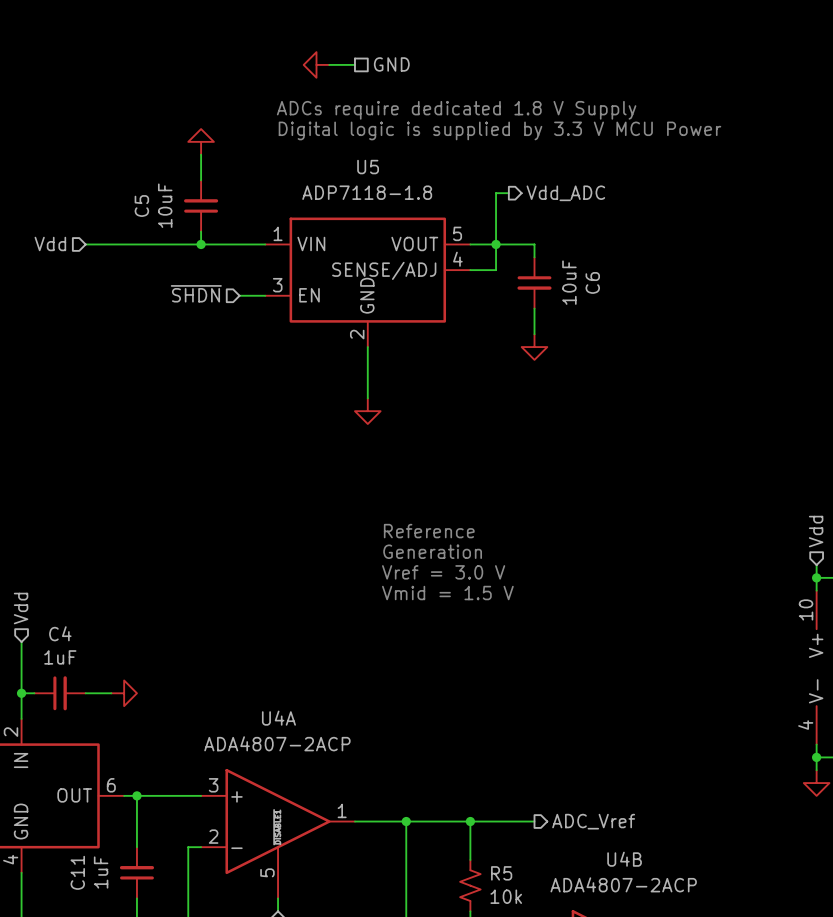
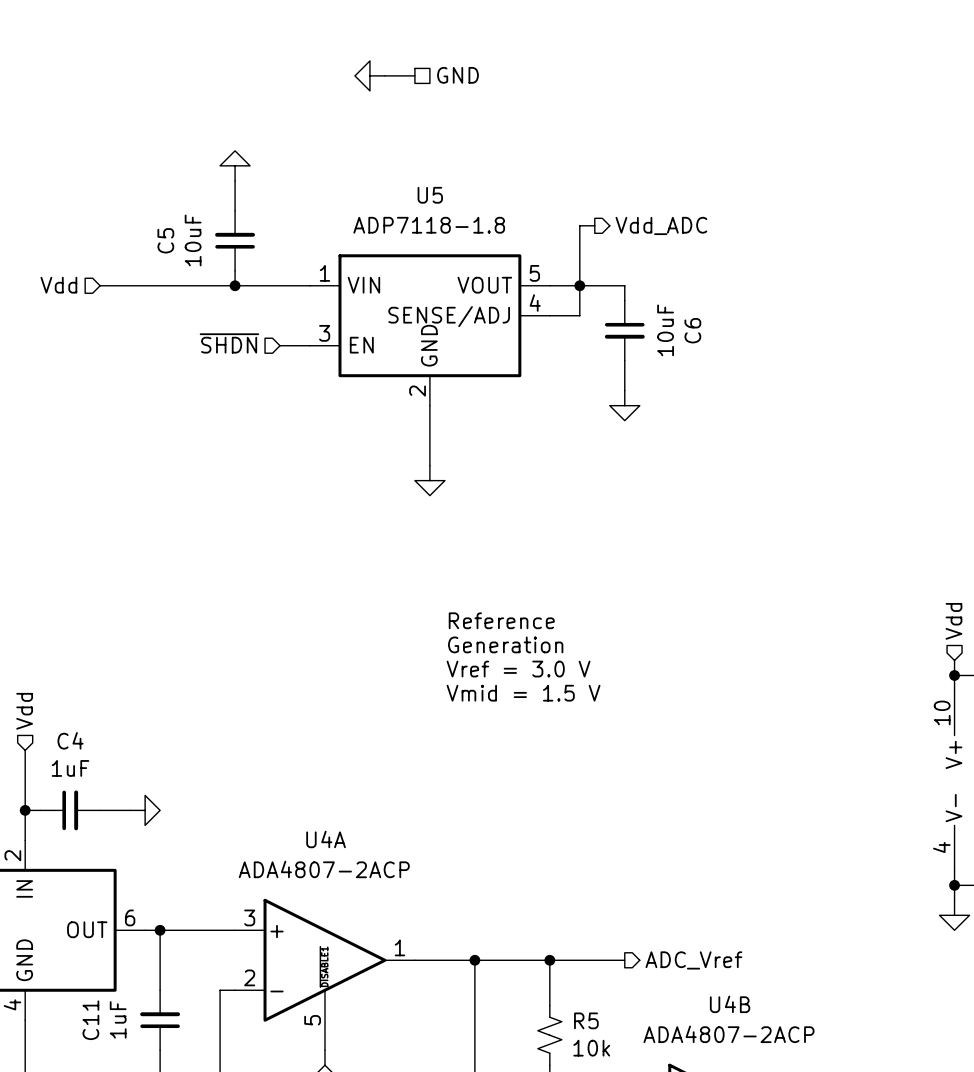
text: ADCs require dedicated 1.8 V Supply (456, 110) -> none
text: Digital logic is supplied by 3.3 V MCU Power (499, 130) -> none

